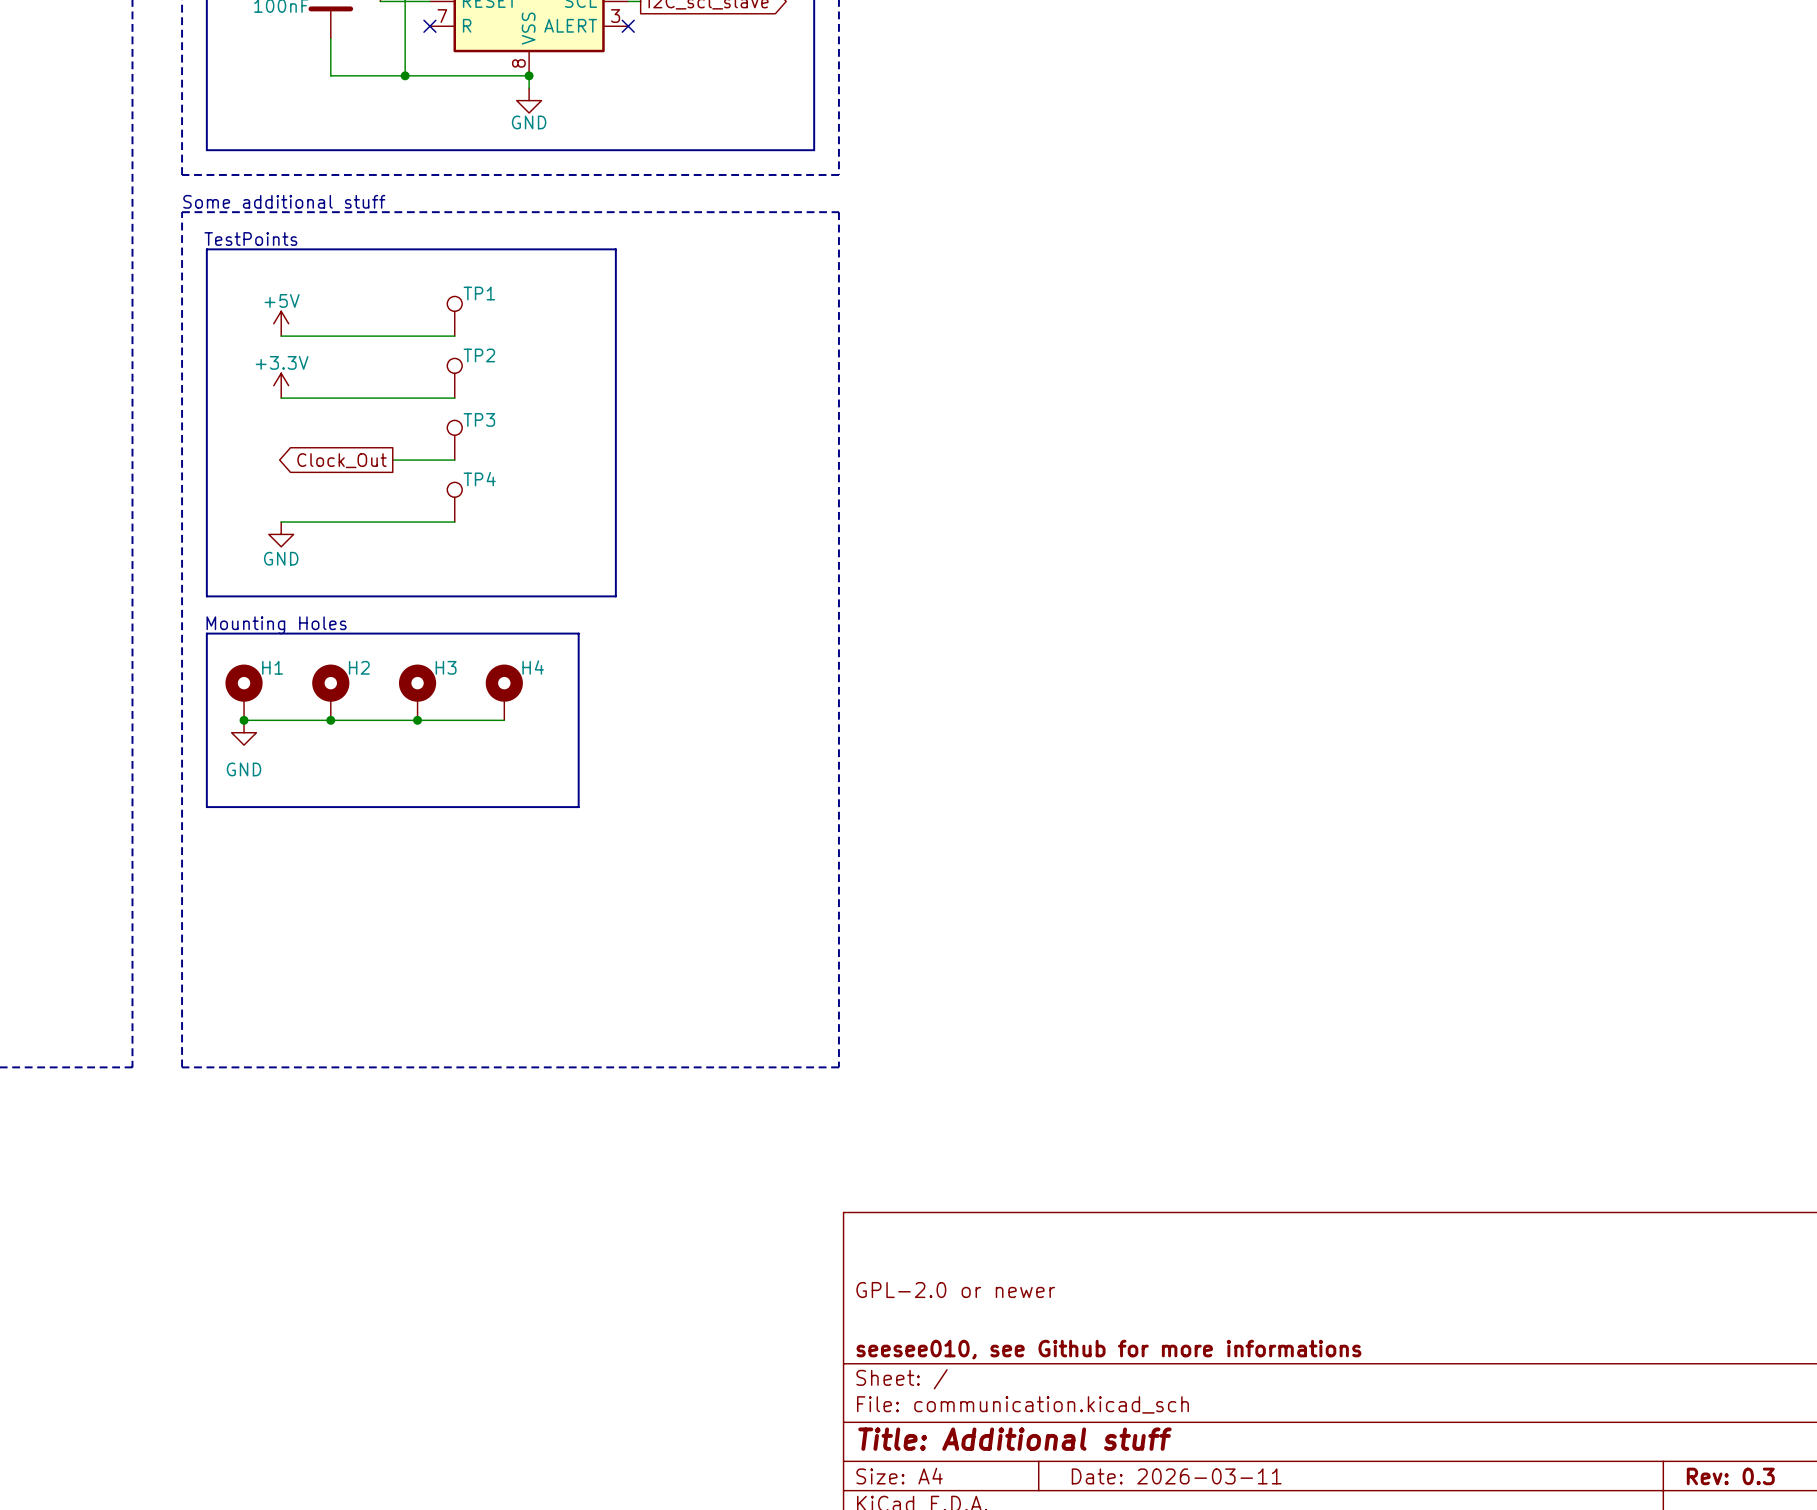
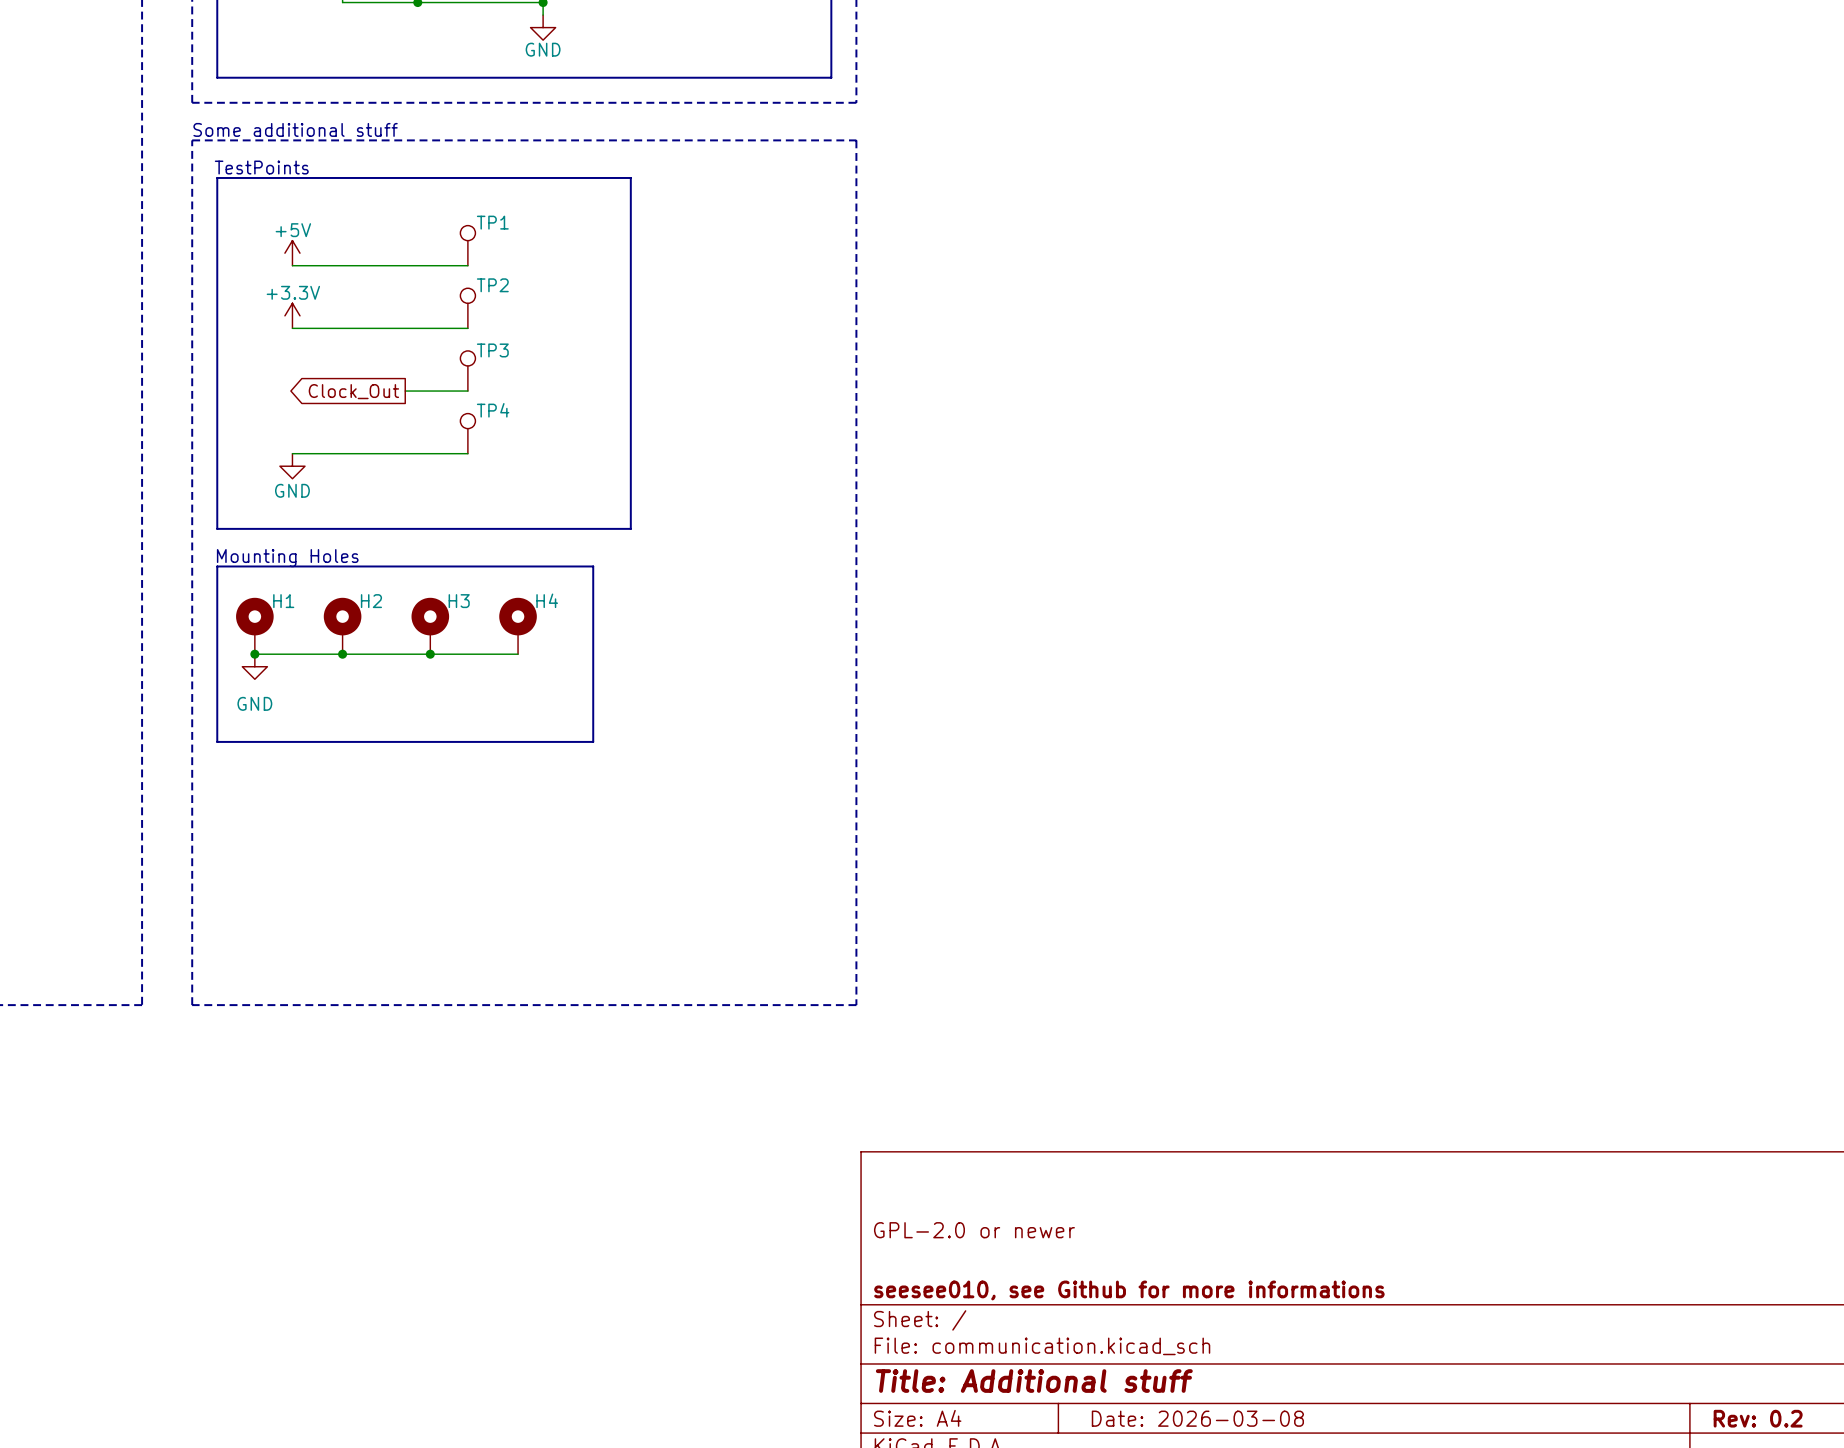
title block: Date: 2026-03-11 (1176, 1476) -> Date: 2026-03-08 (1197, 1418)
title block: Rev: 0.3 (1730, 1476) -> Rev: 0.2 (1758, 1418)

